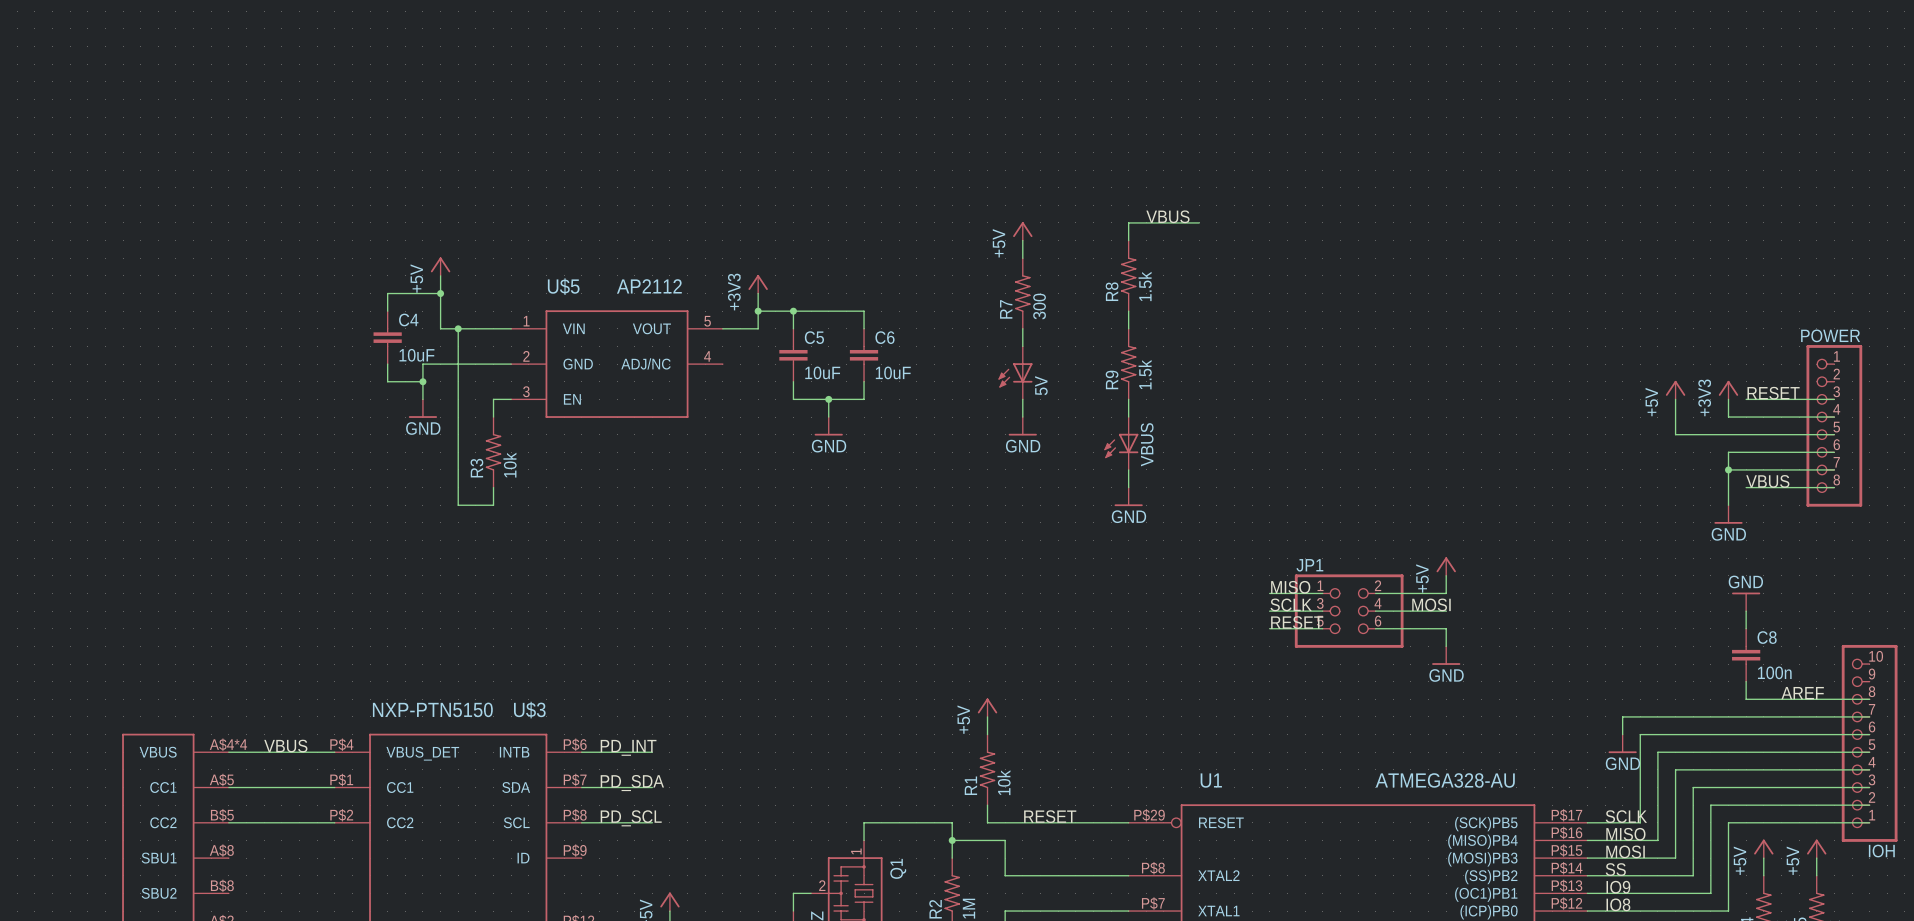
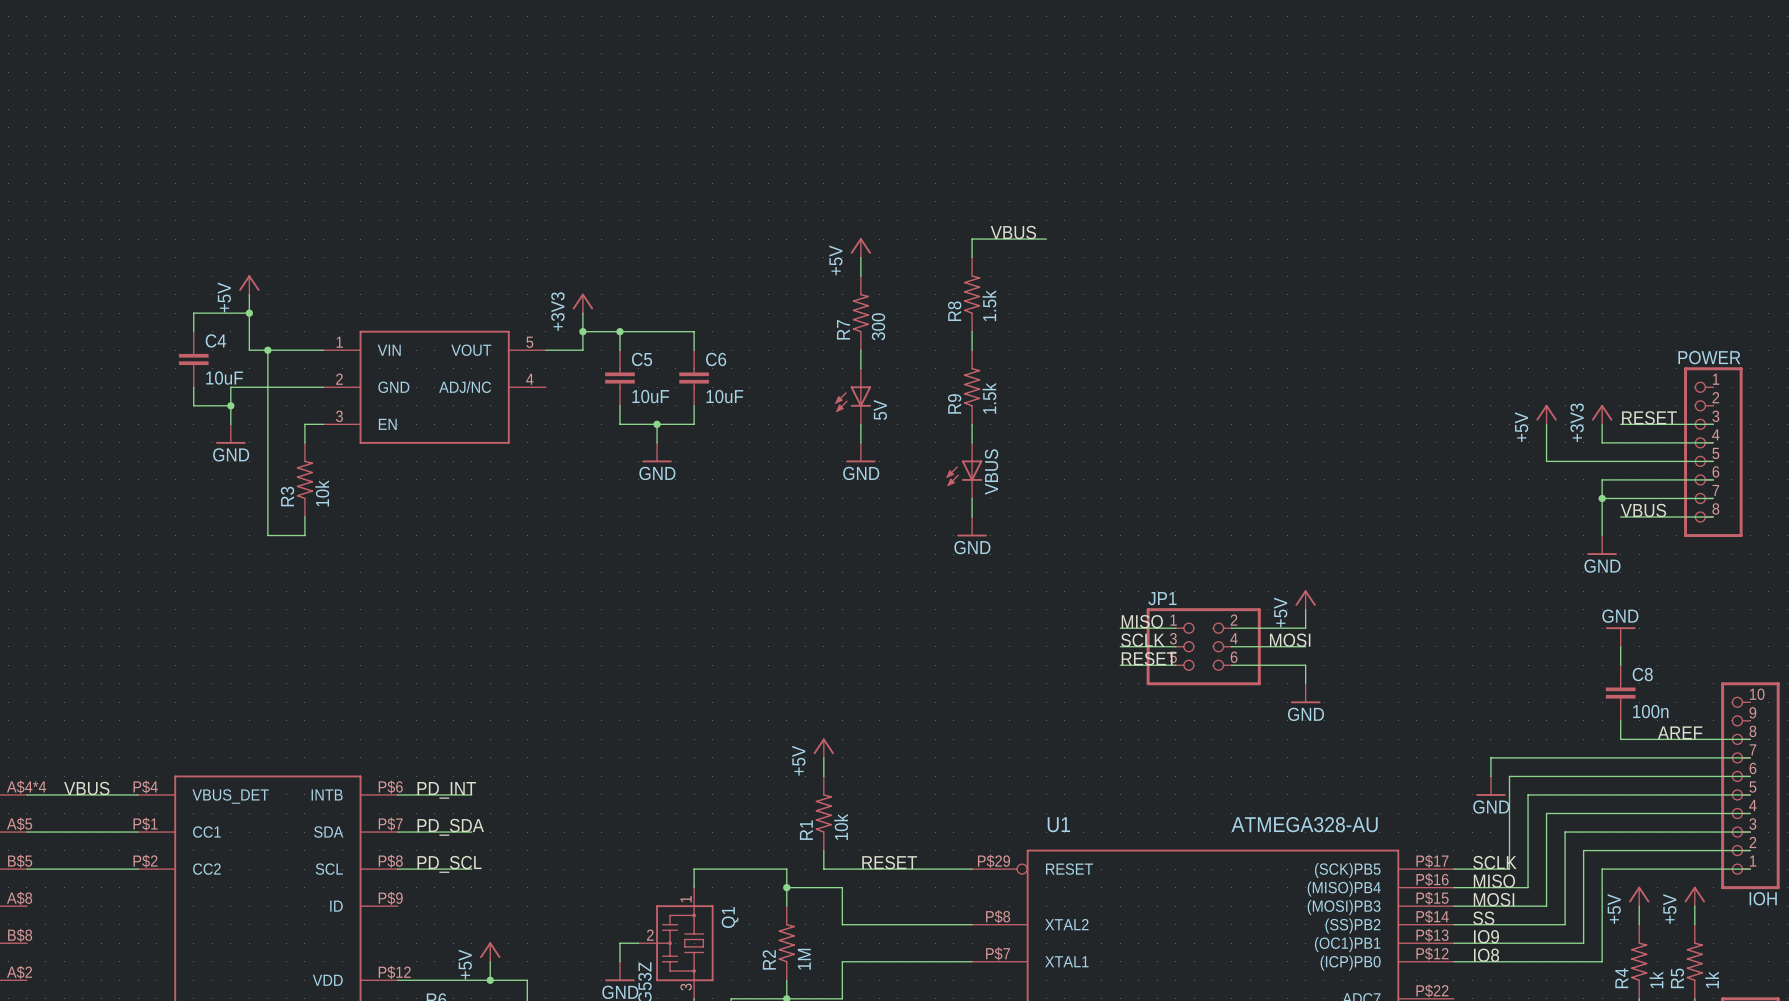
U$5 name: U$5 (563, 286) -> none
U$5 value: AP2112 (649, 286) -> none
U$3 value: NXP-PTN5150 (432, 709) -> none
U$3 name: U$3 (529, 710) -> none

